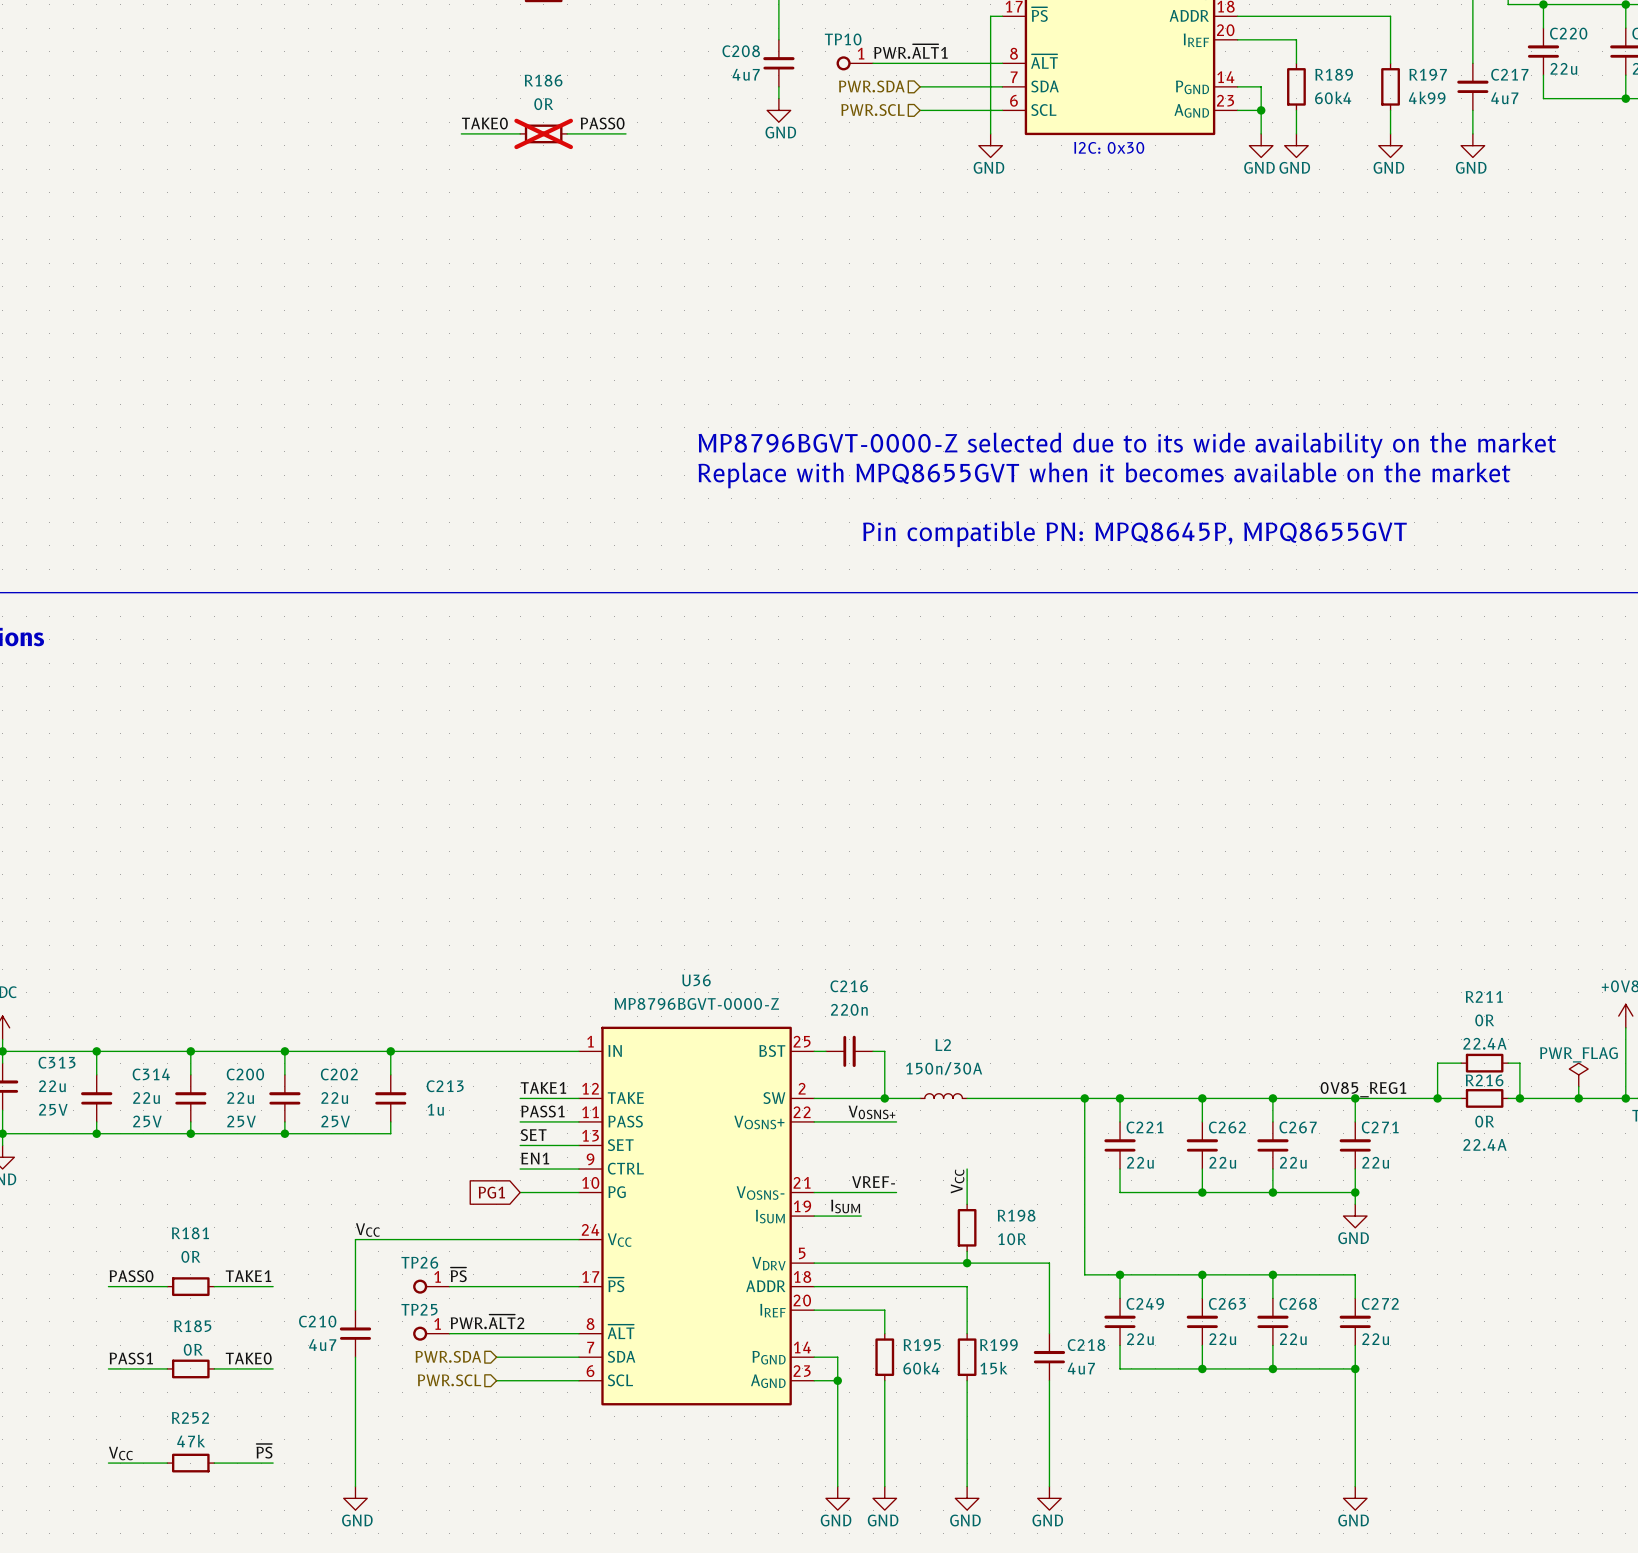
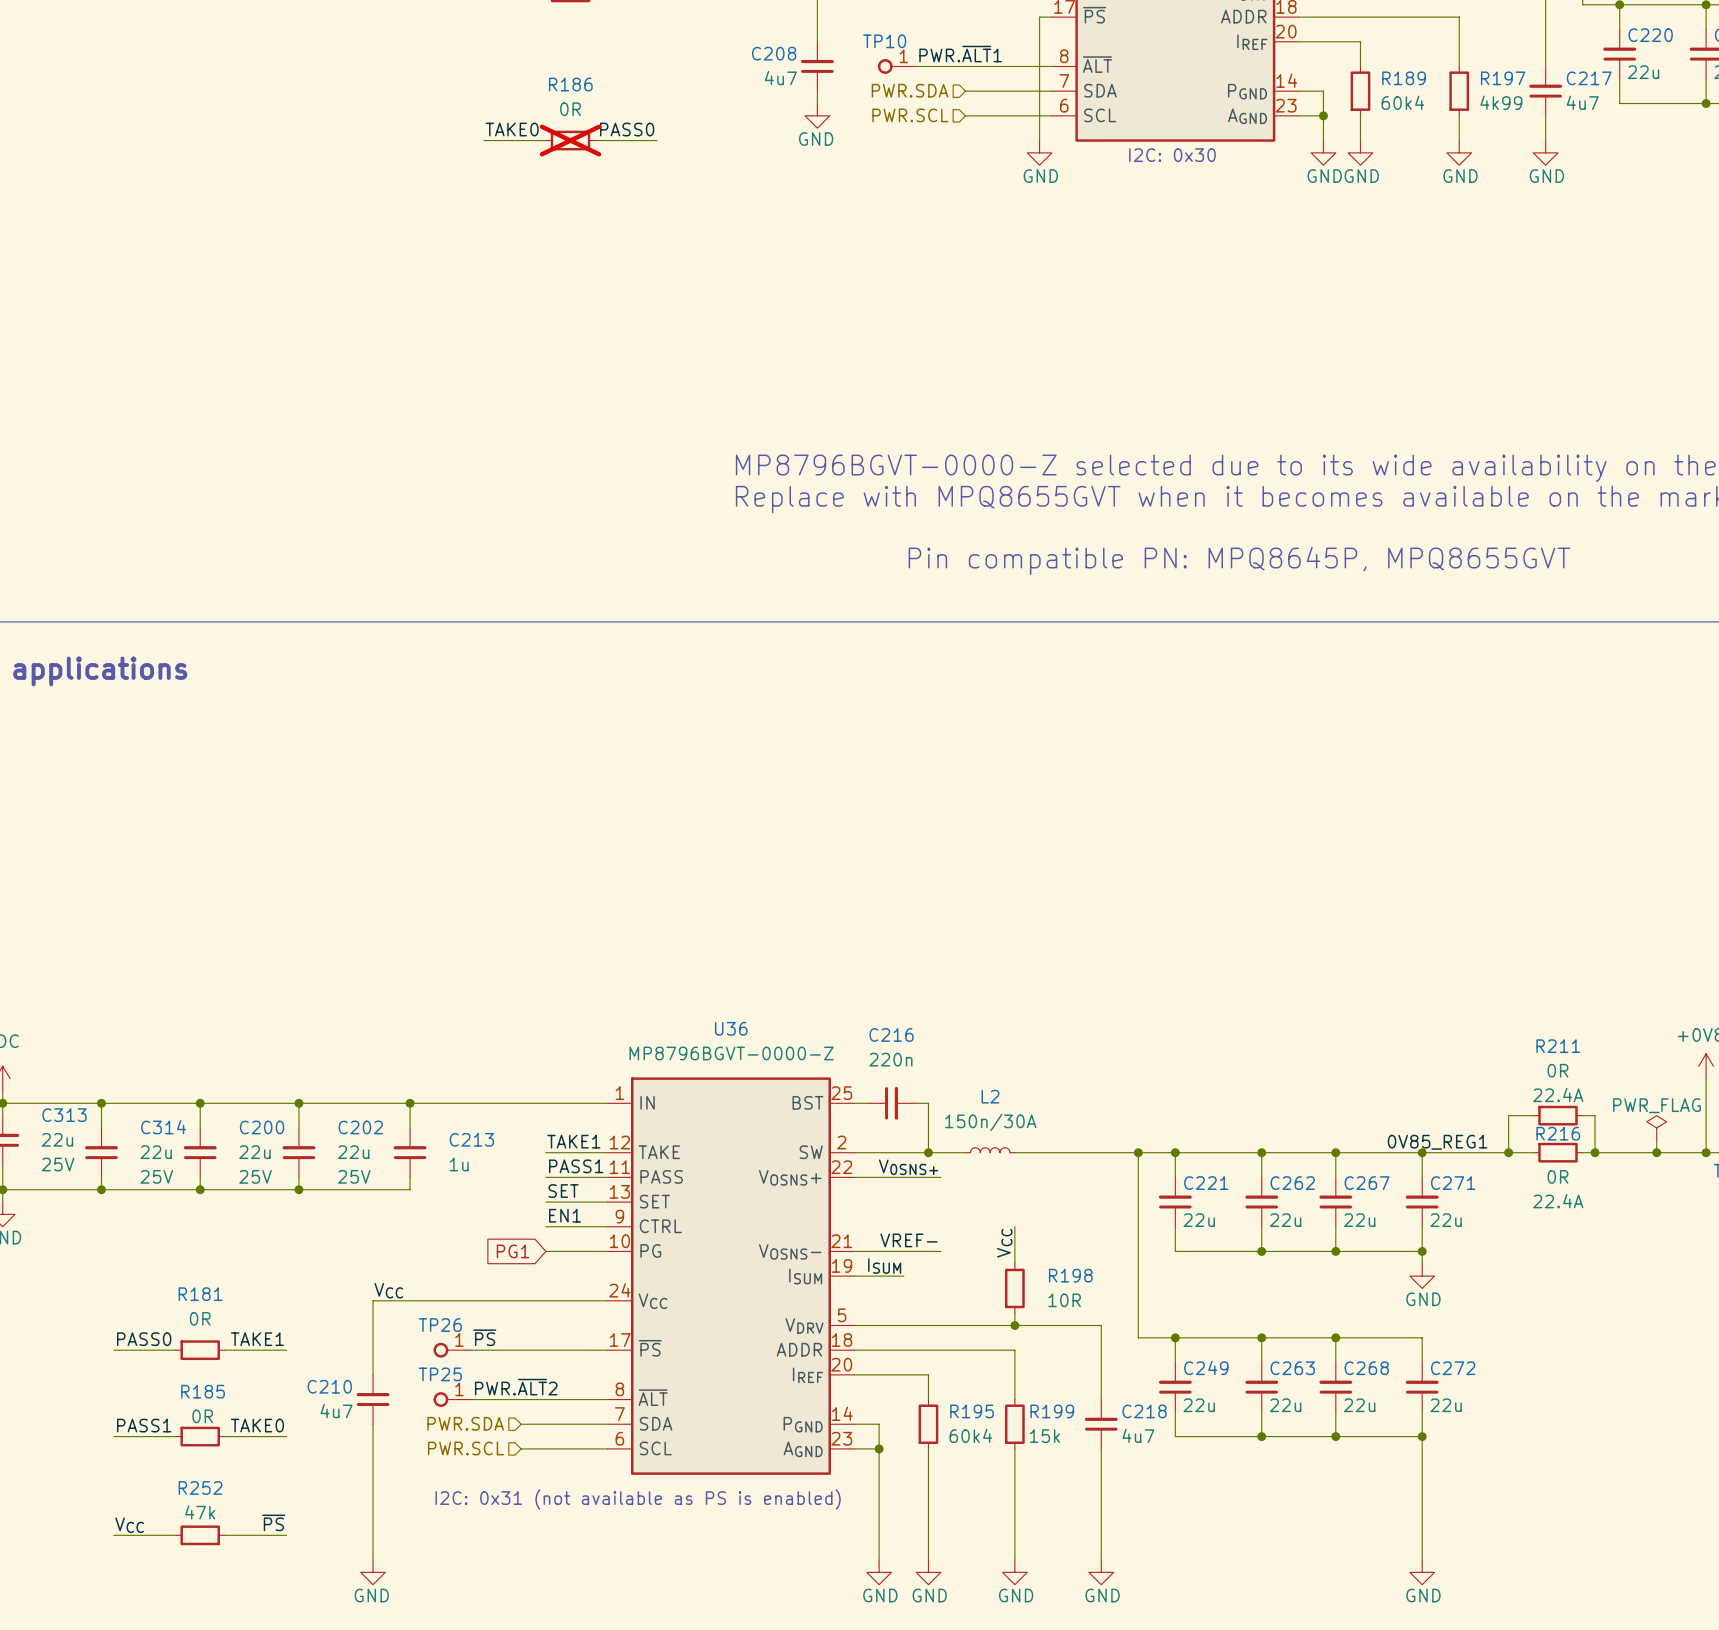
text: none -> I2C: 0x31 (not available as PS is enabled) (638, 1499)

